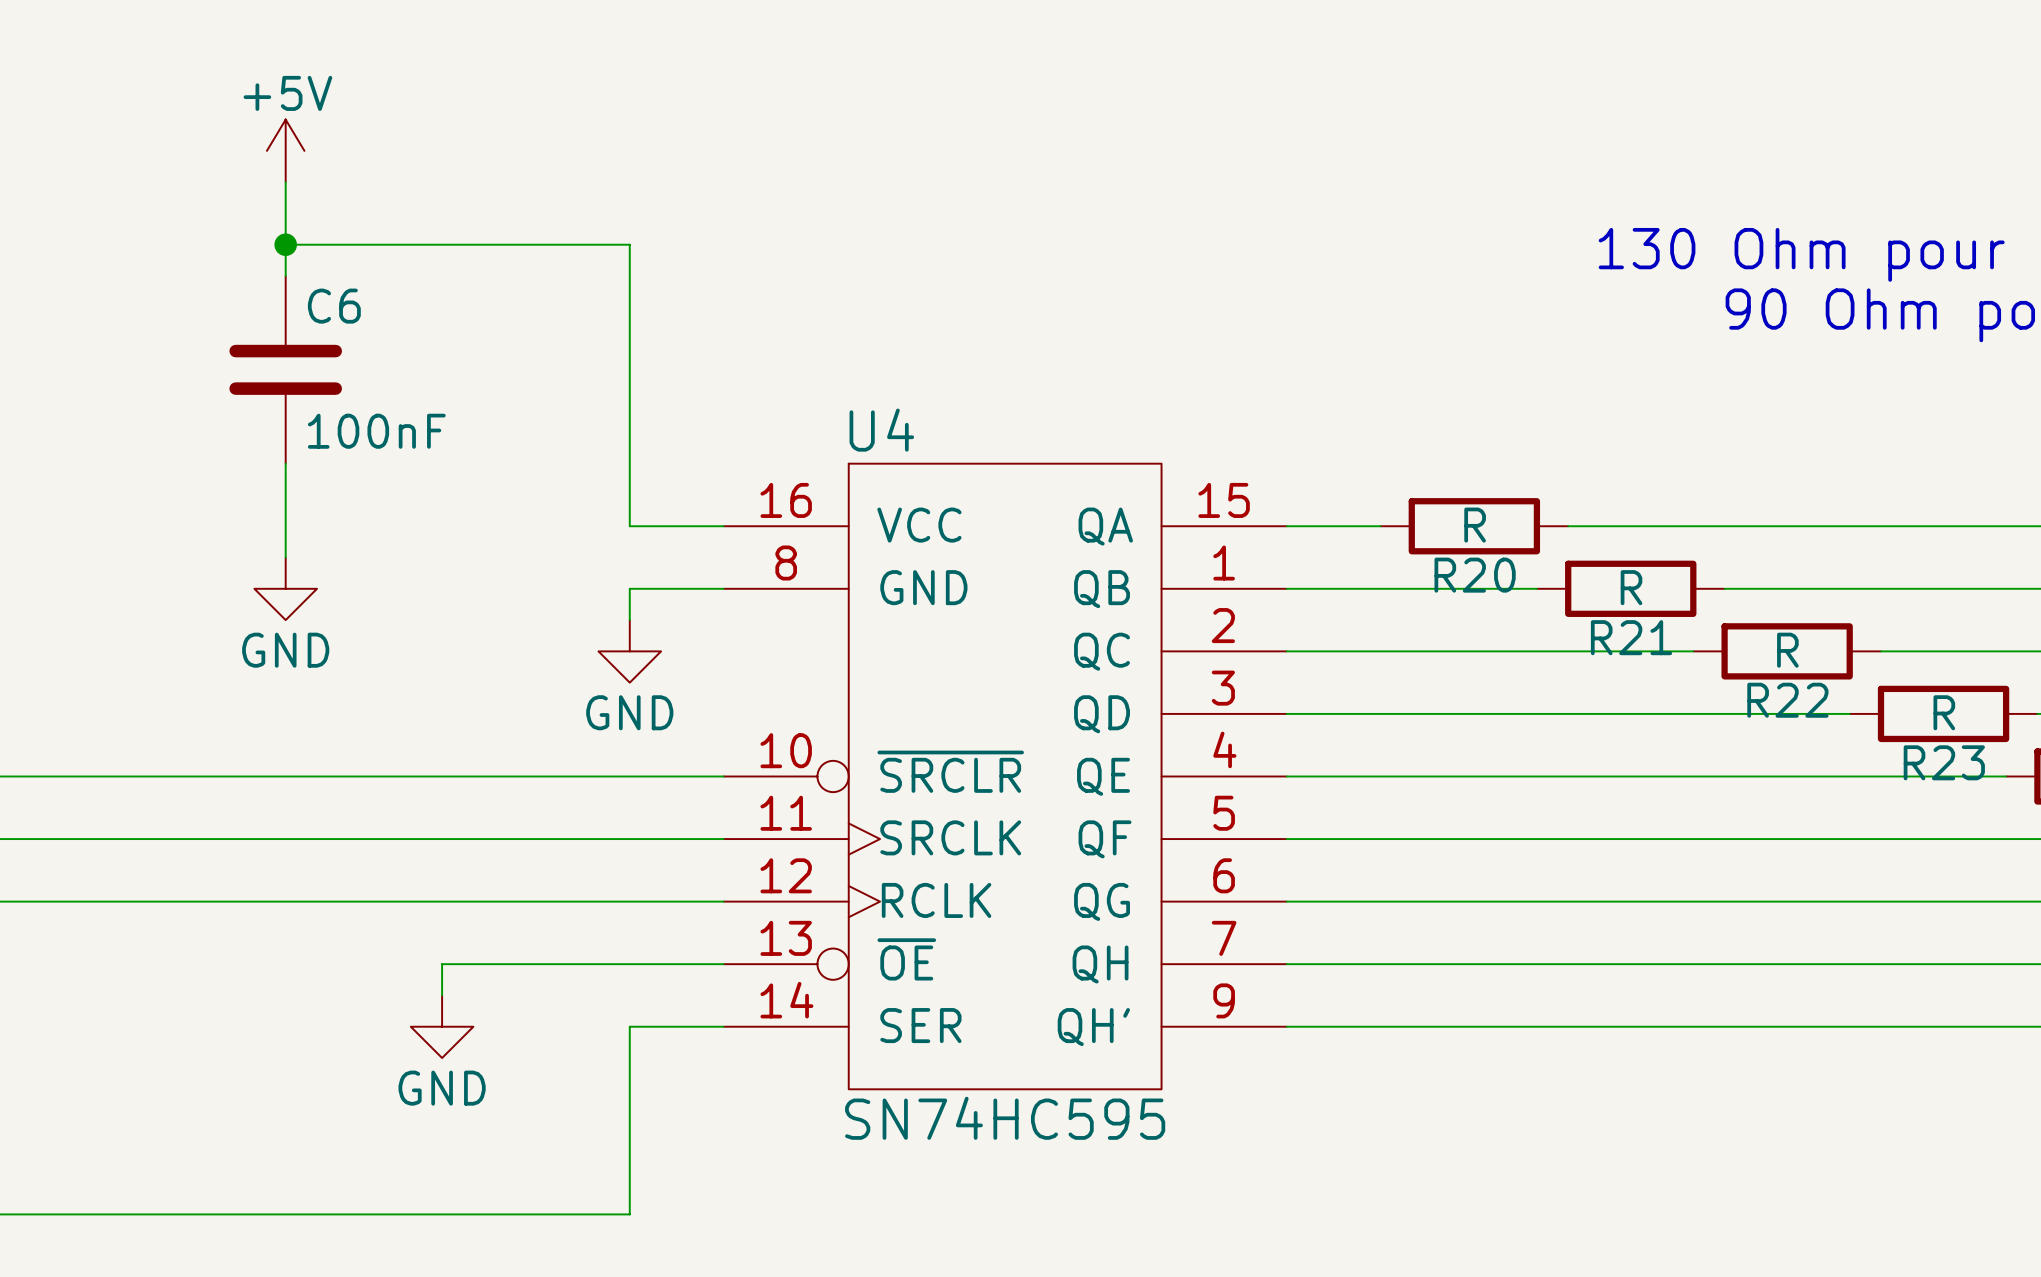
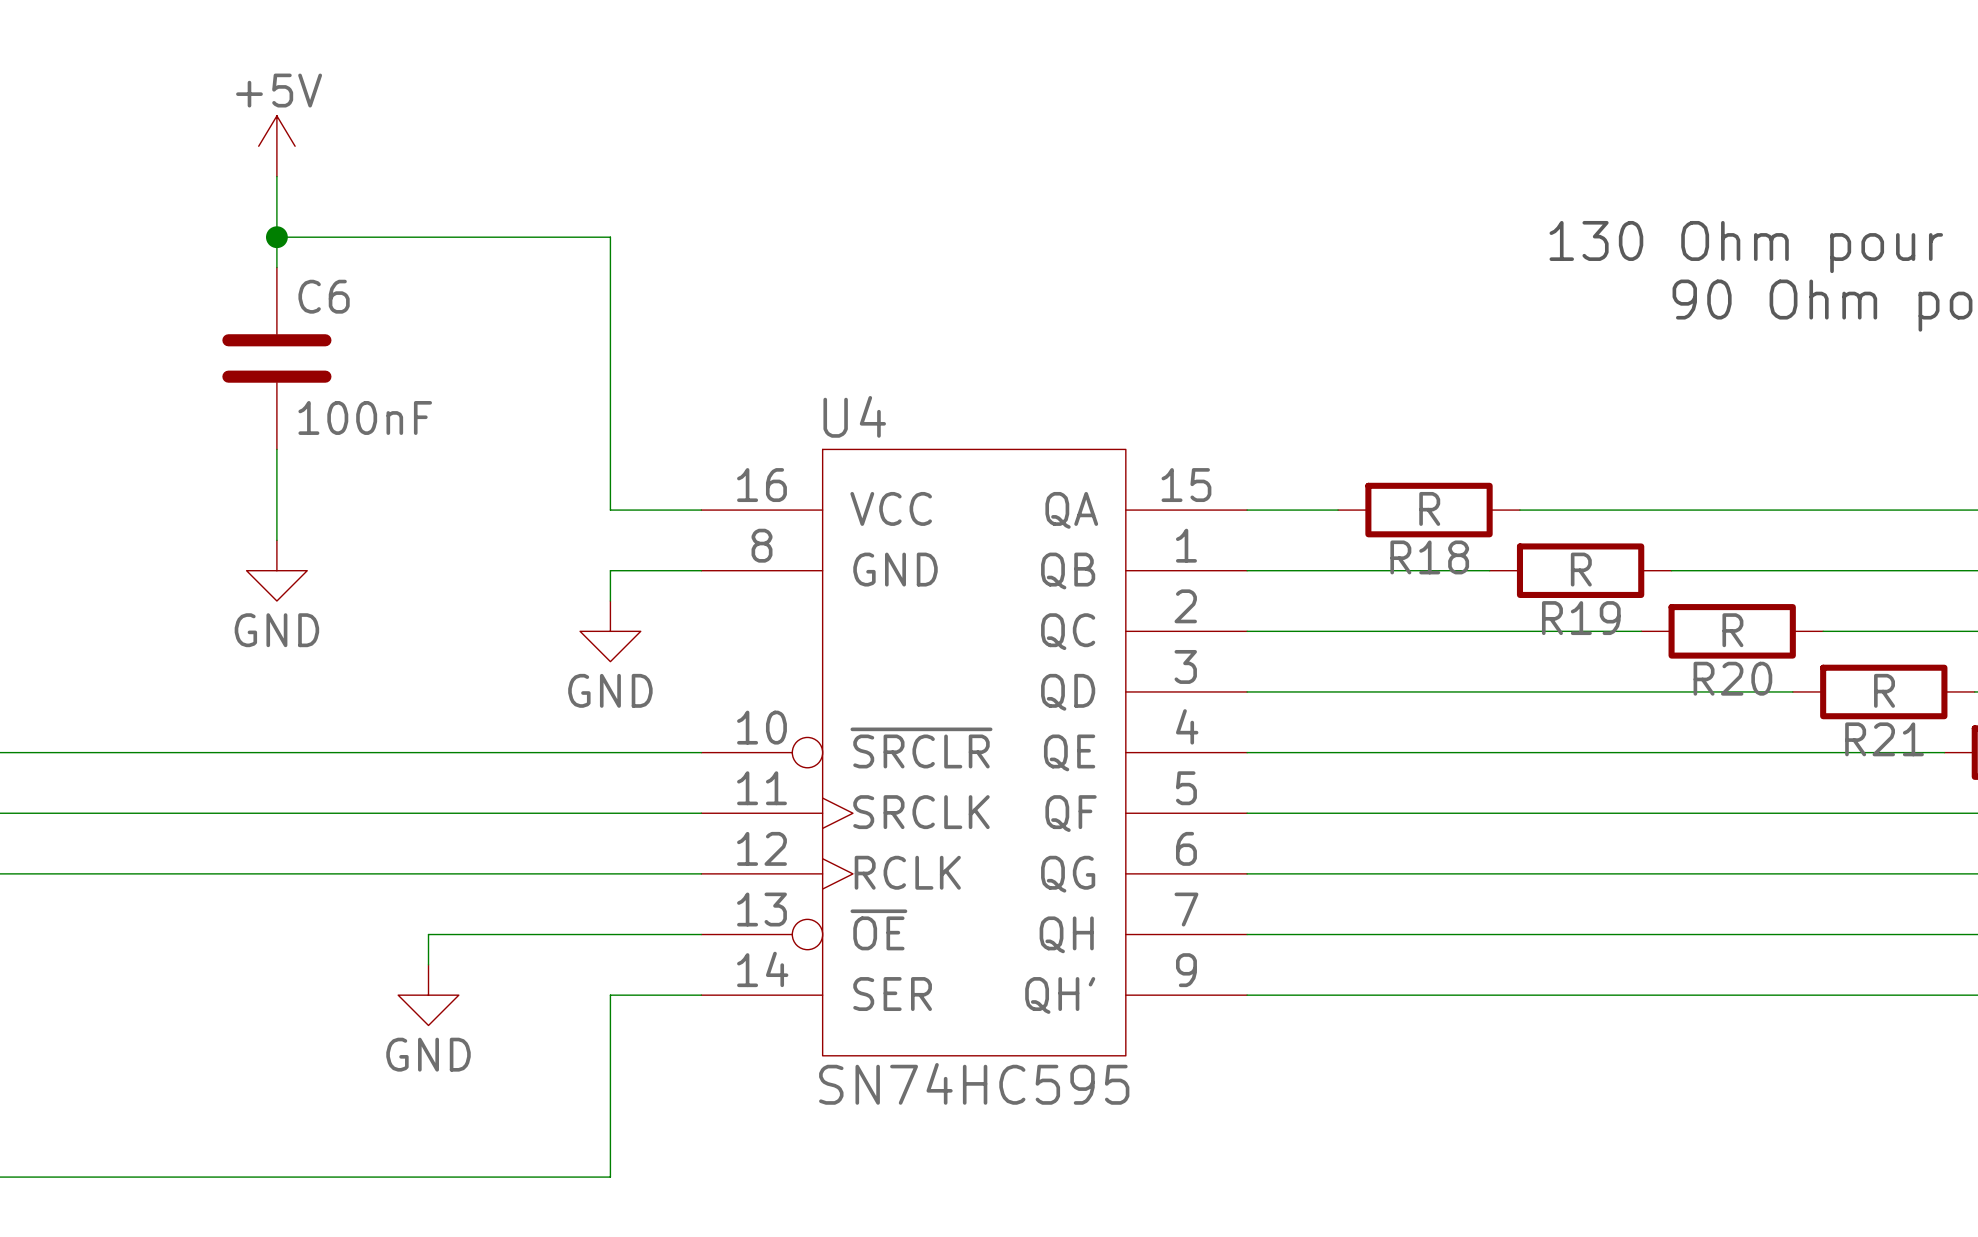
R20 name: R20 (1475, 575) -> R18 (1429, 557)
R21 name: R21 (1631, 637) -> R19 (1581, 618)
R22 name: R22 (1787, 700) -> R20 (1732, 678)
R23 name: R23 (1944, 762) -> R21 (1884, 739)

